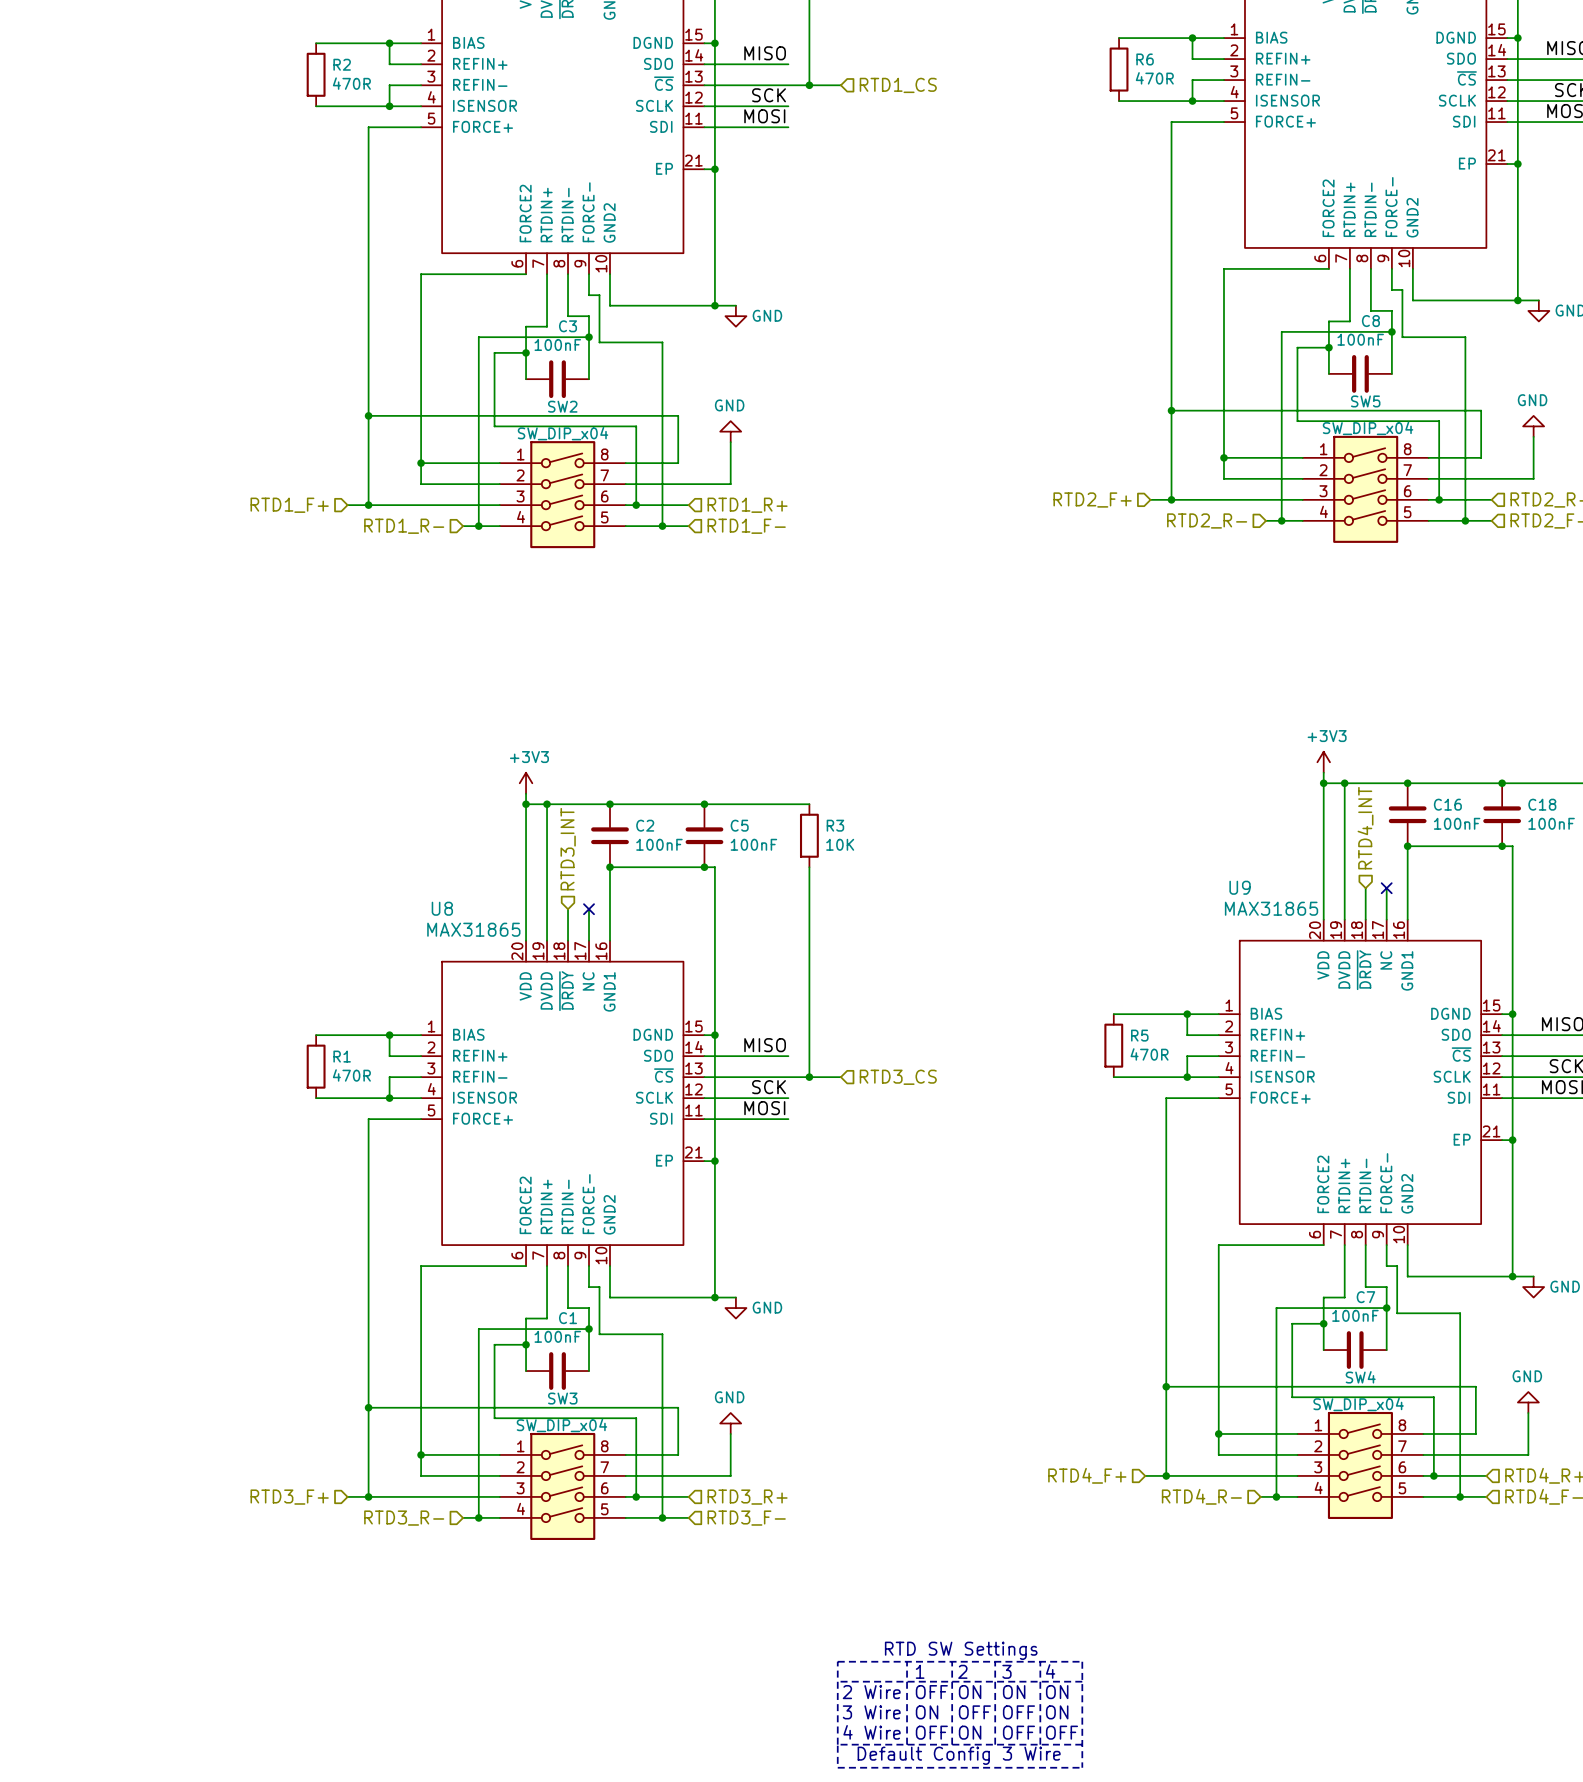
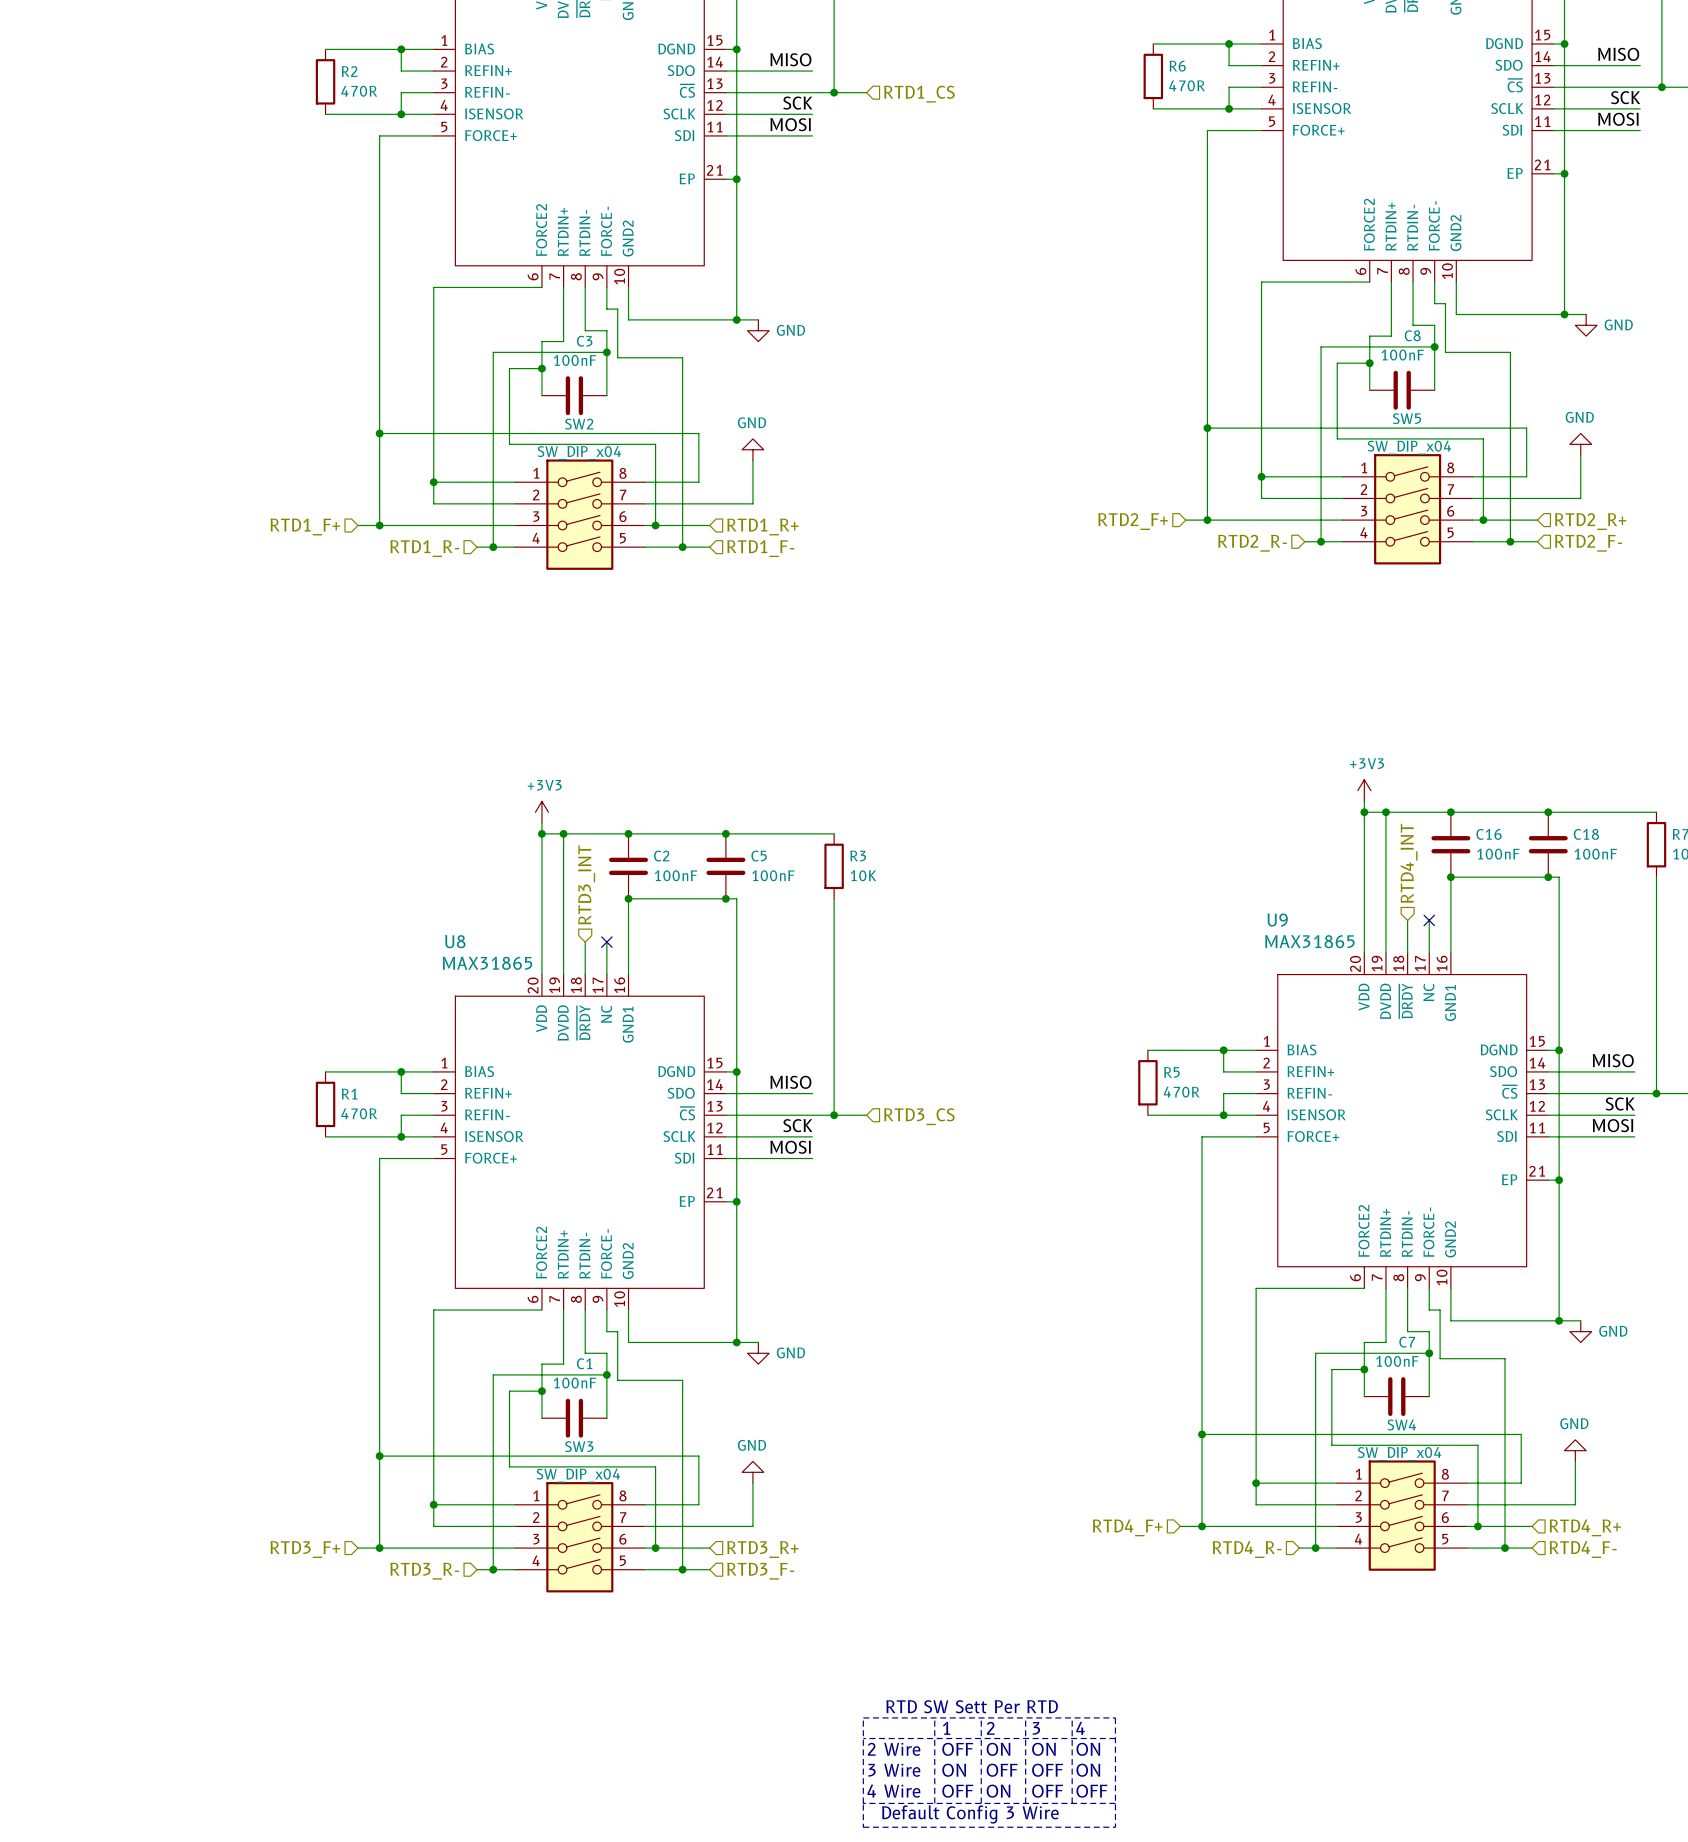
text: RTD SW Settings (961, 1650) -> RTD SW Sett Per RTD (972, 1706)

